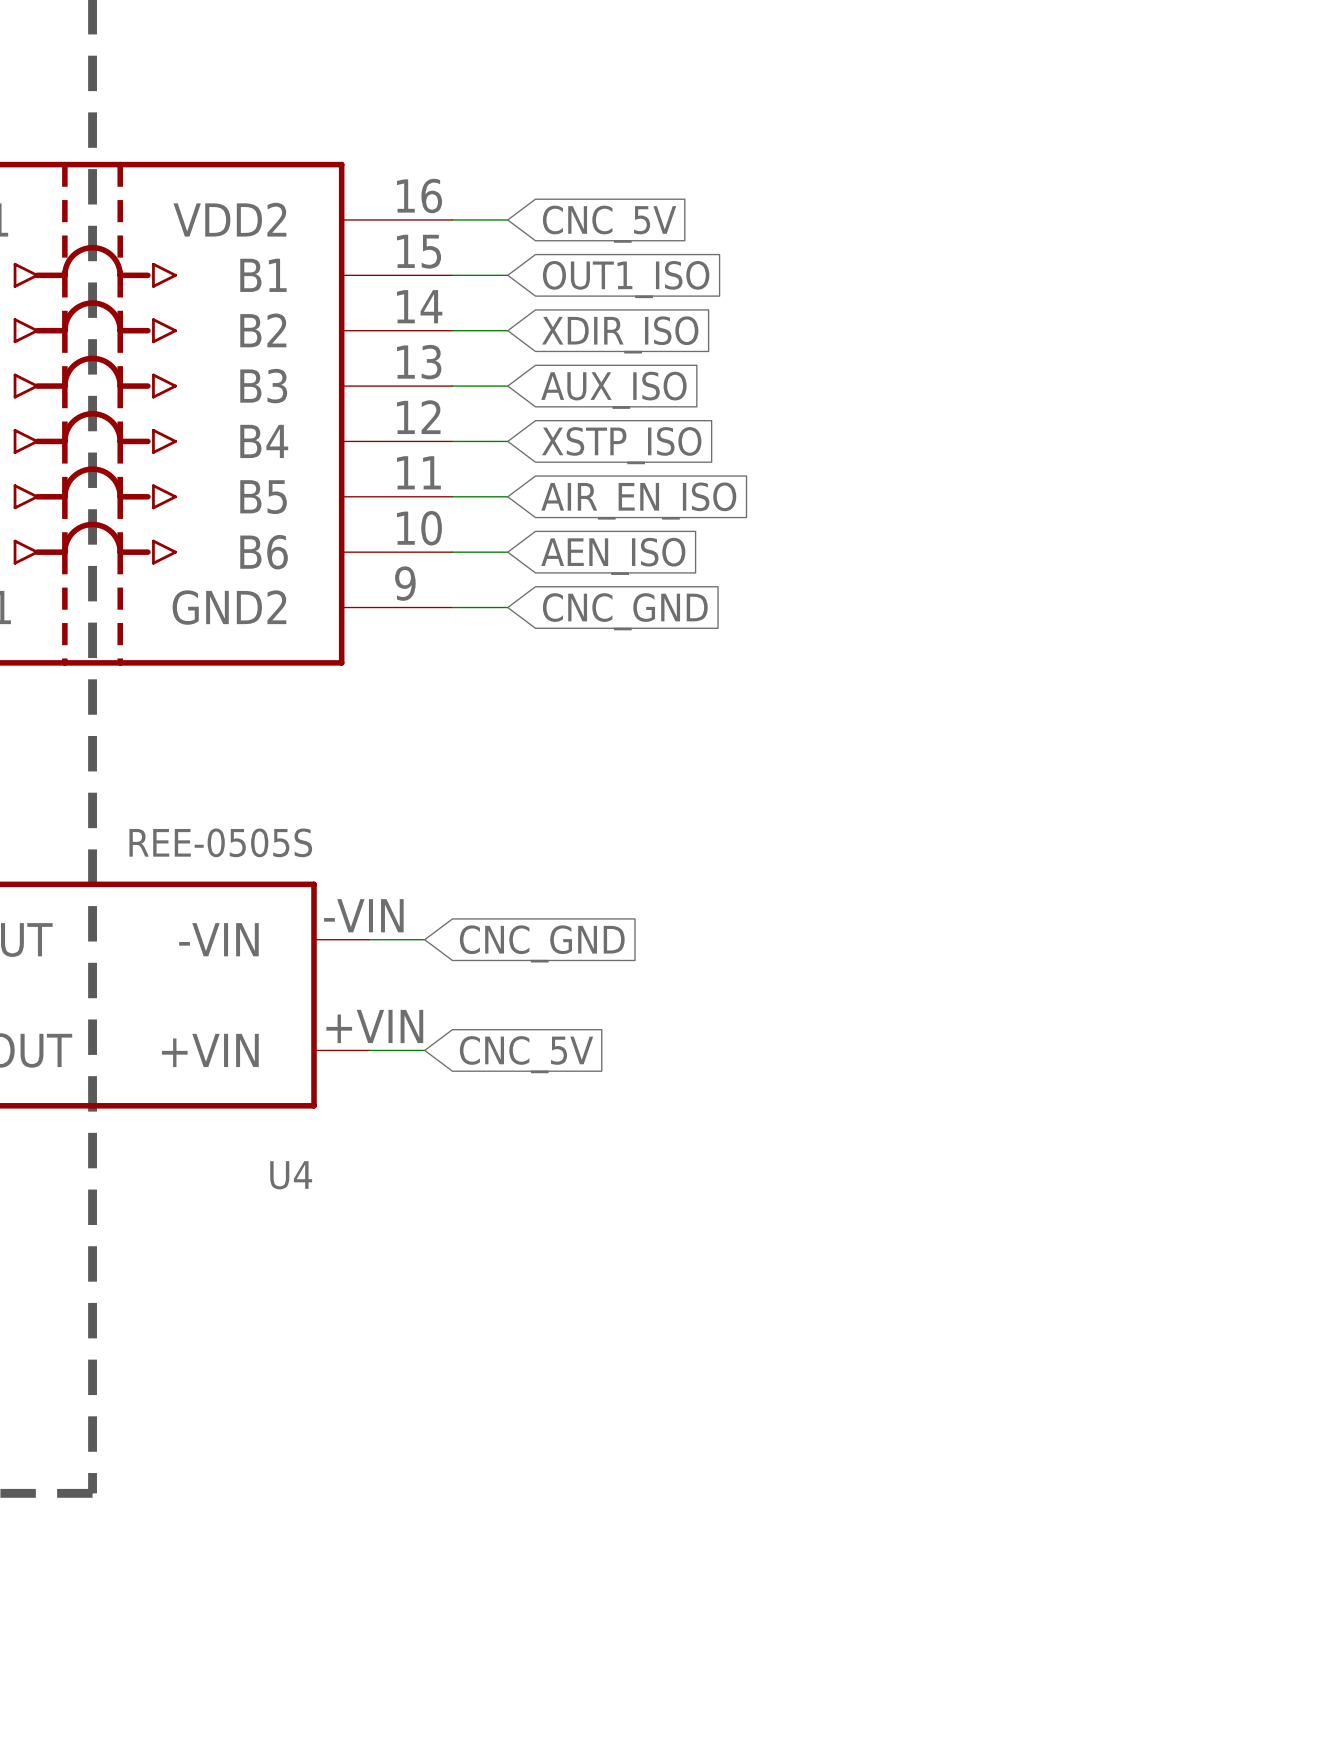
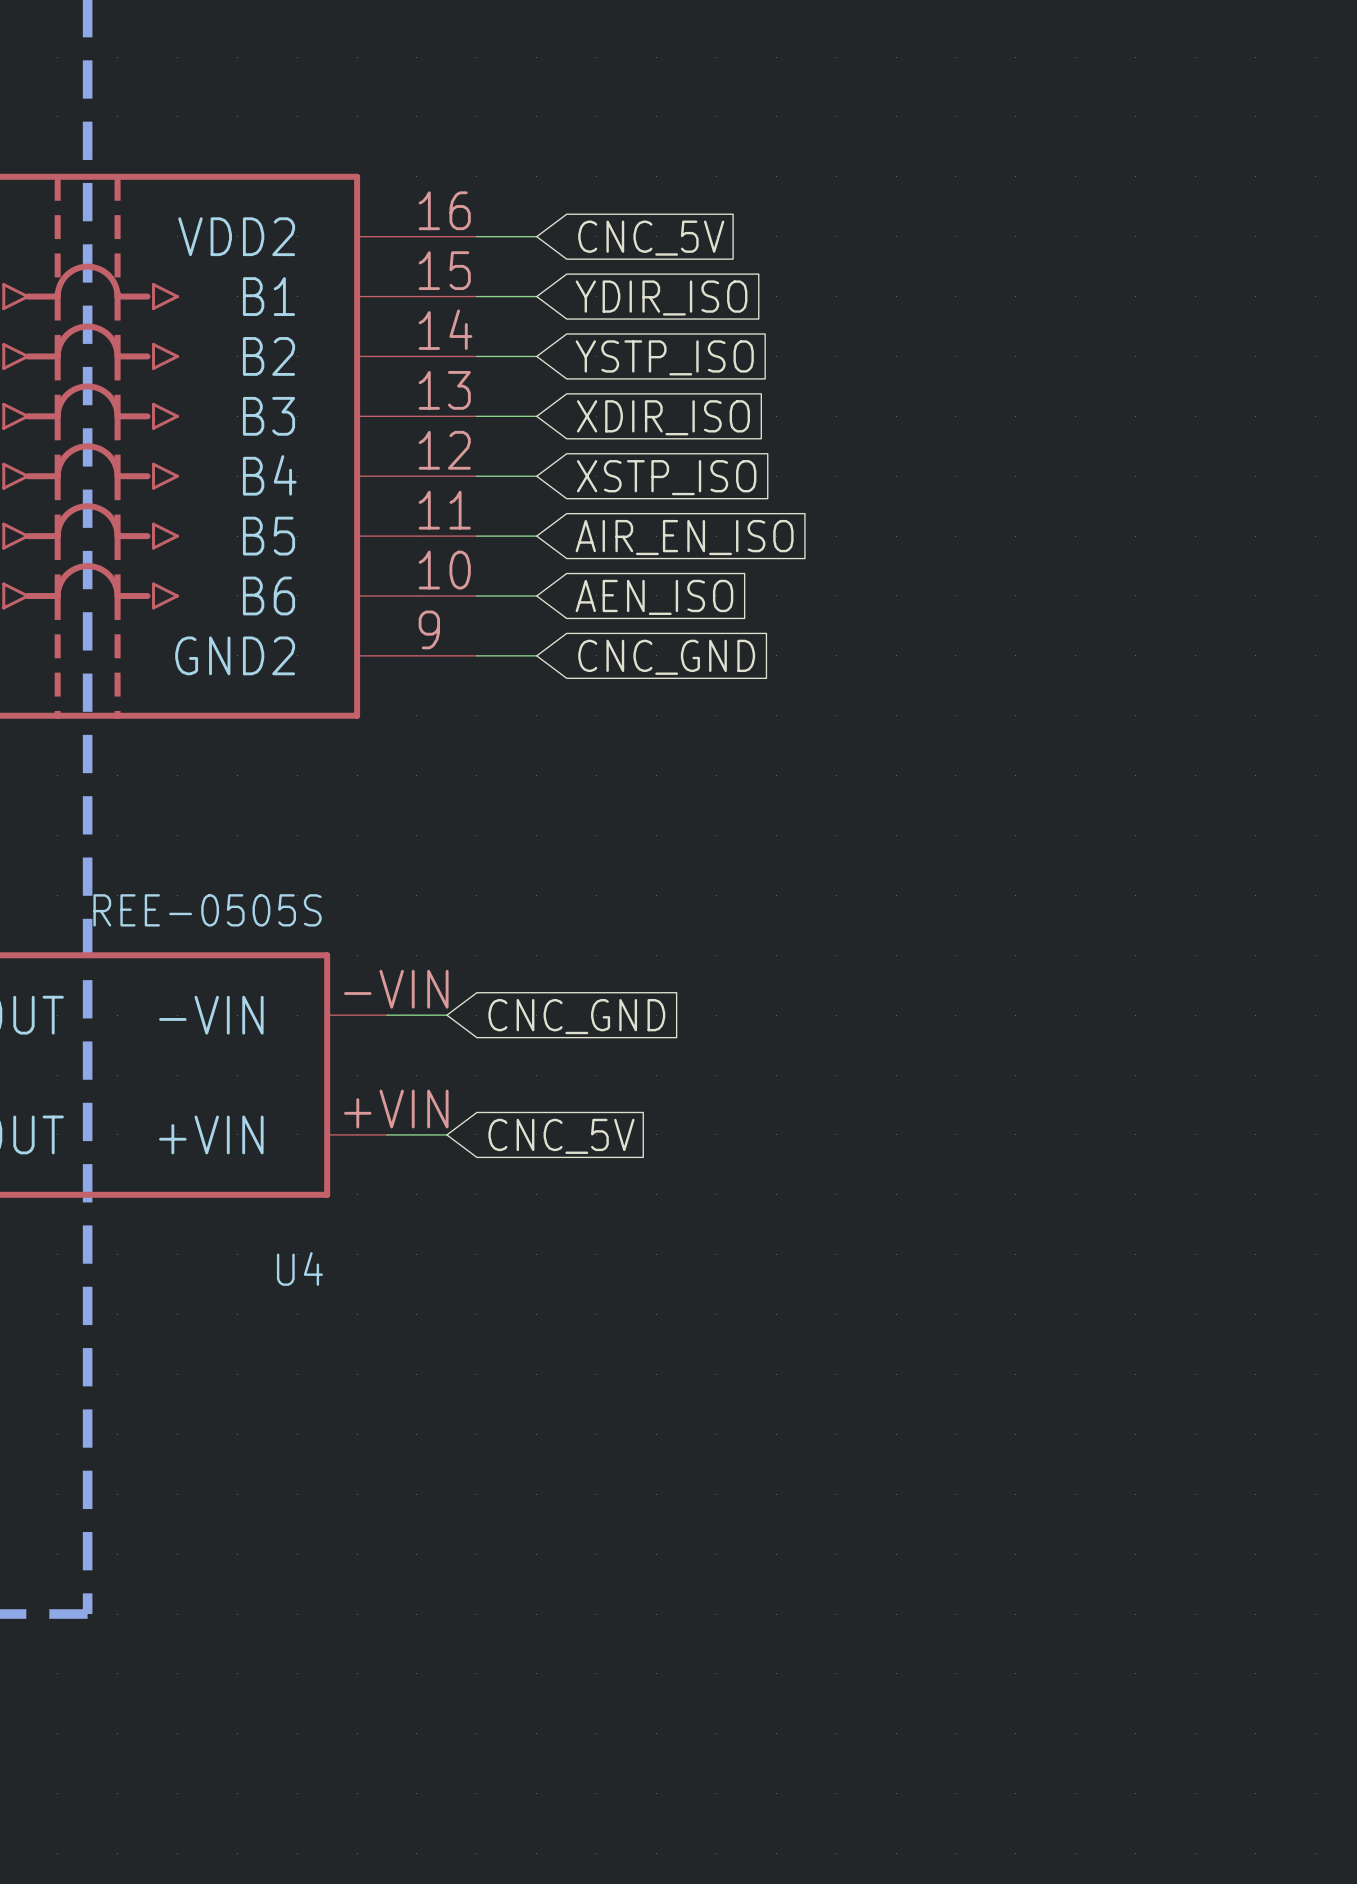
global label: OUT1_ISO (626, 279) -> YDIR_ISO (661, 297)
global label: XDIR_ISO (620, 334) -> YSTP_ISO (664, 357)
global label: AUX_ISO (613, 390) -> XDIR_ISO (663, 417)

